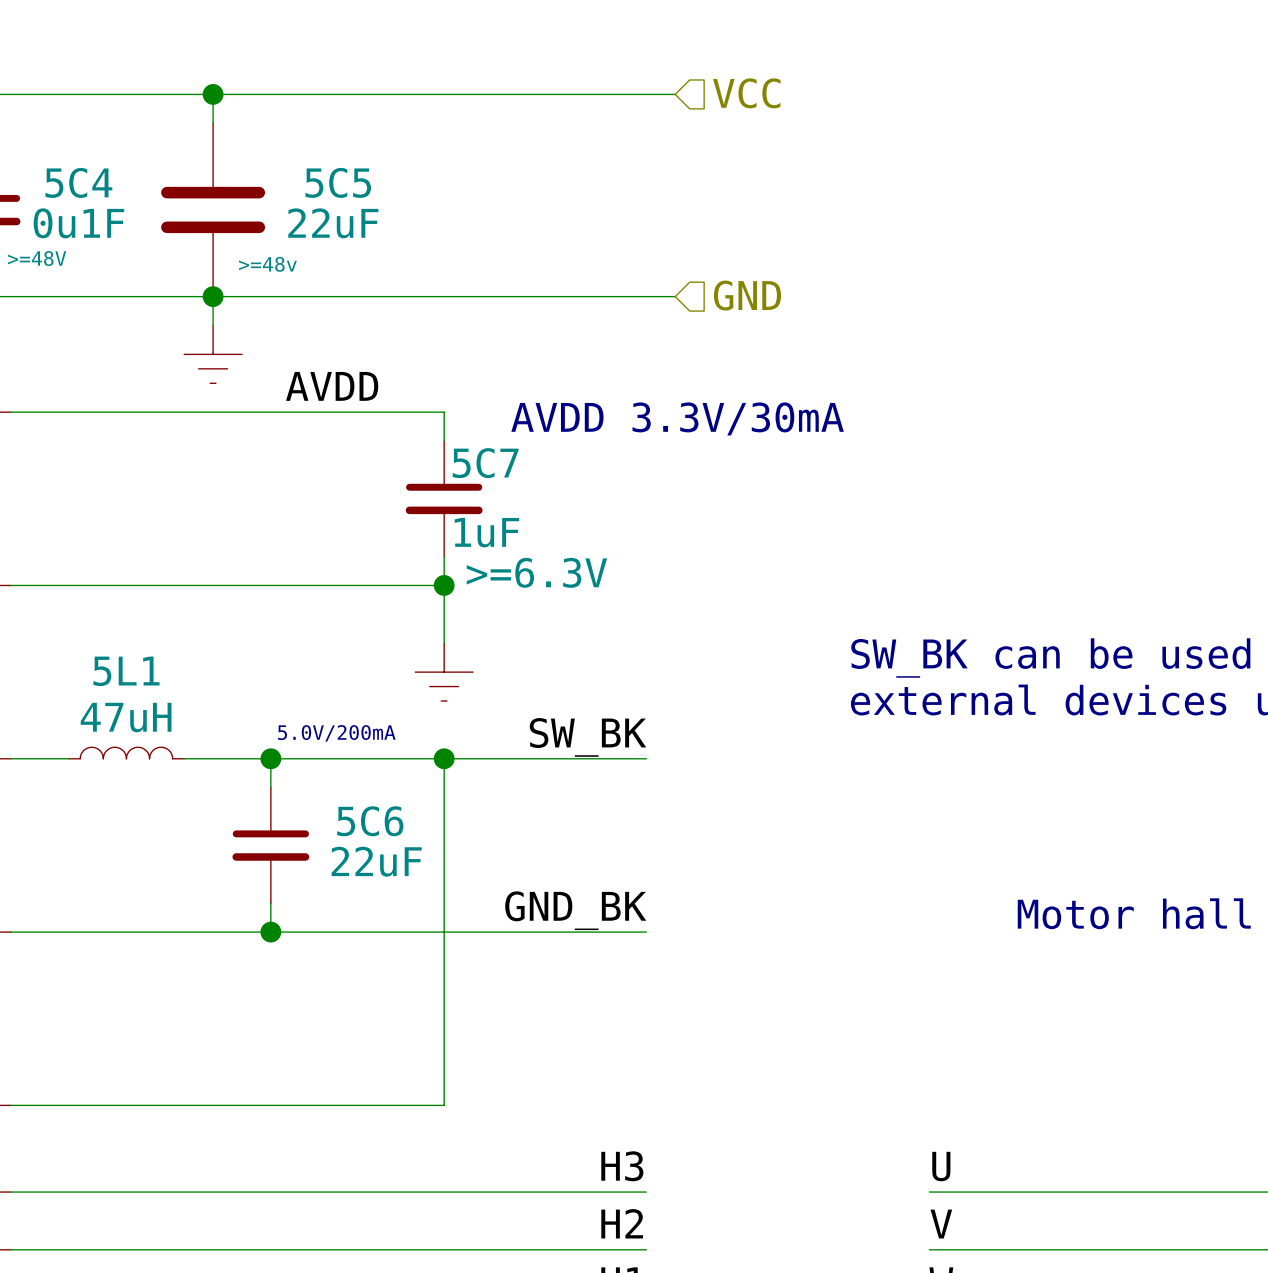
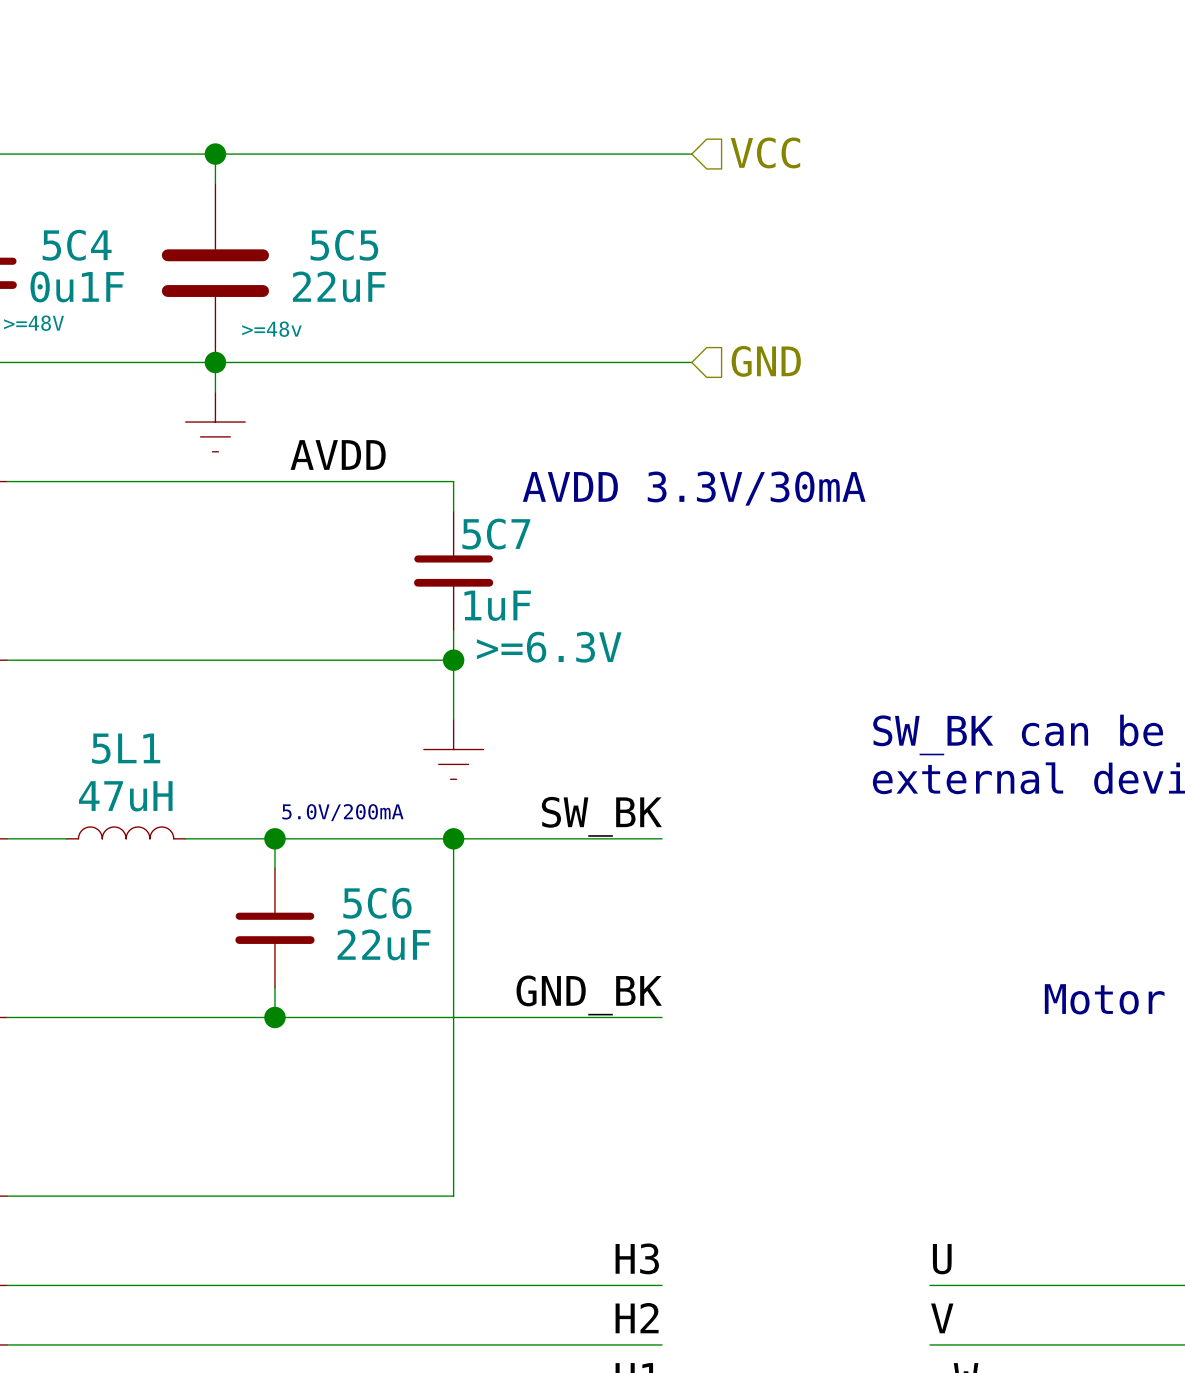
label position: U (941, 1166) -> U (942, 1259)
wire: none -> (929, 1285) (953, 1285)
label position: V (941, 1224) -> V (942, 1318)
wire: none -> (929, 1344) (953, 1344)

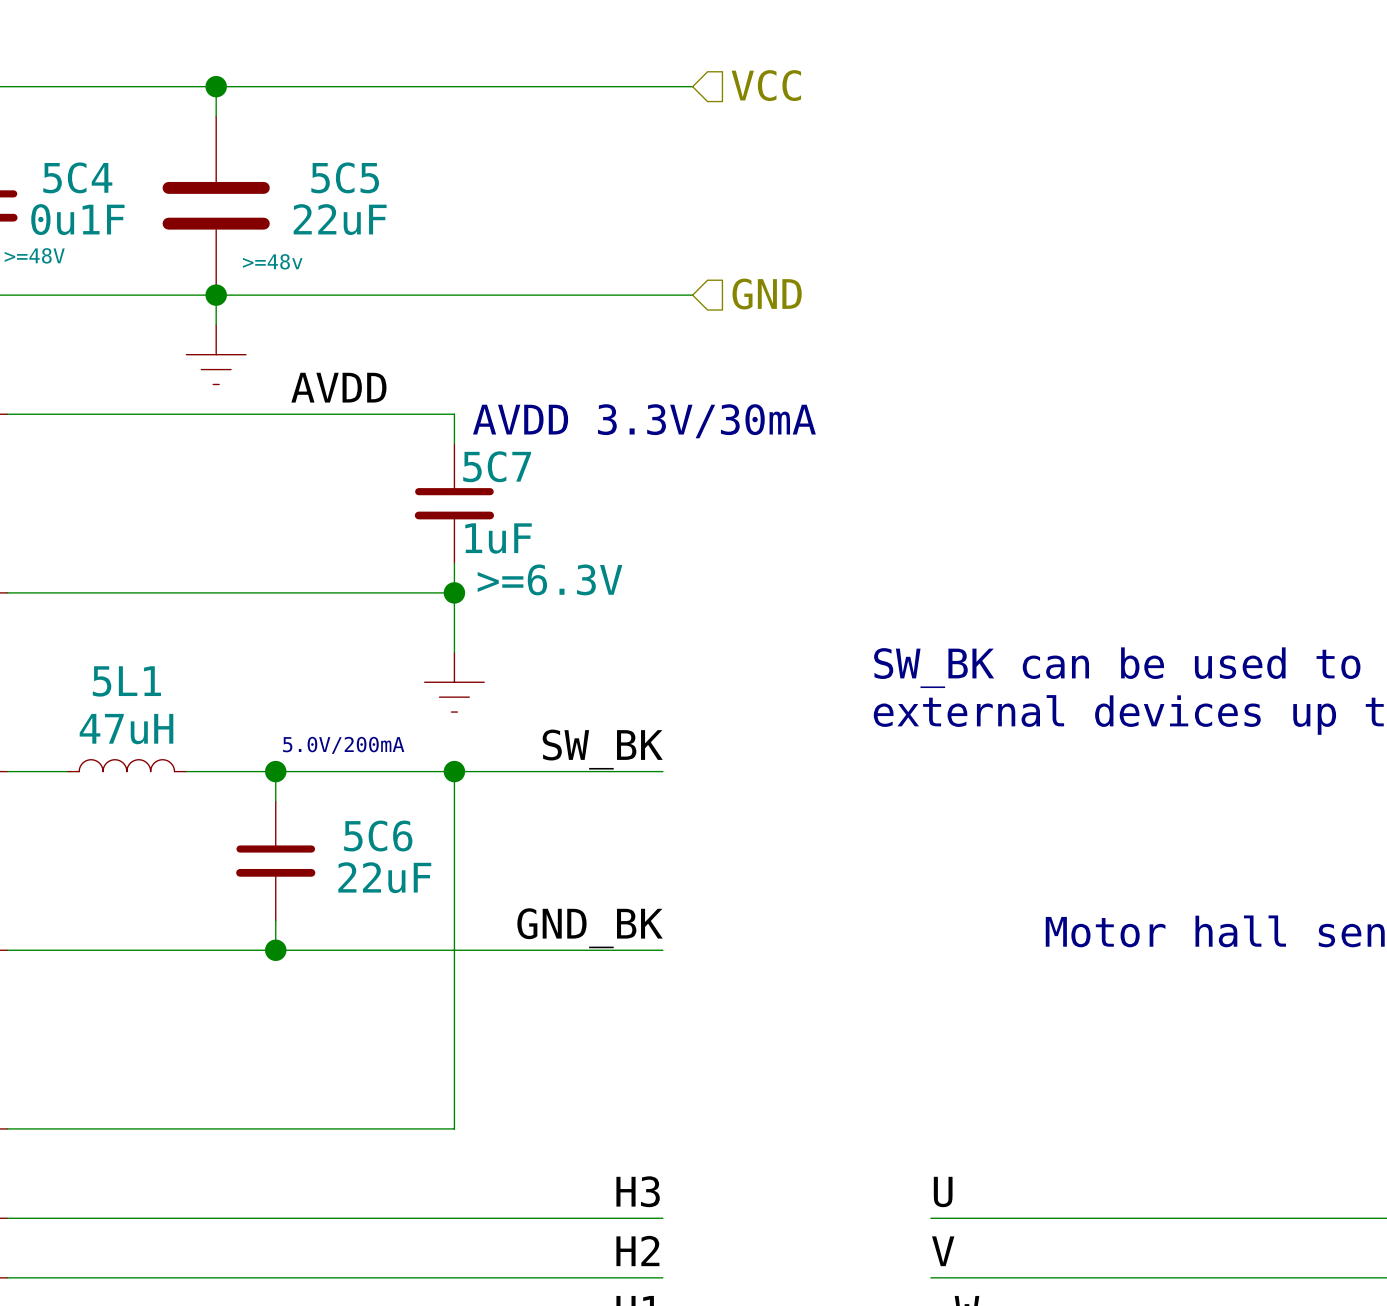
text position: AVDD 3.3V/30mA (694, 488) -> AVDD 3.3V/30mA (644, 421)

